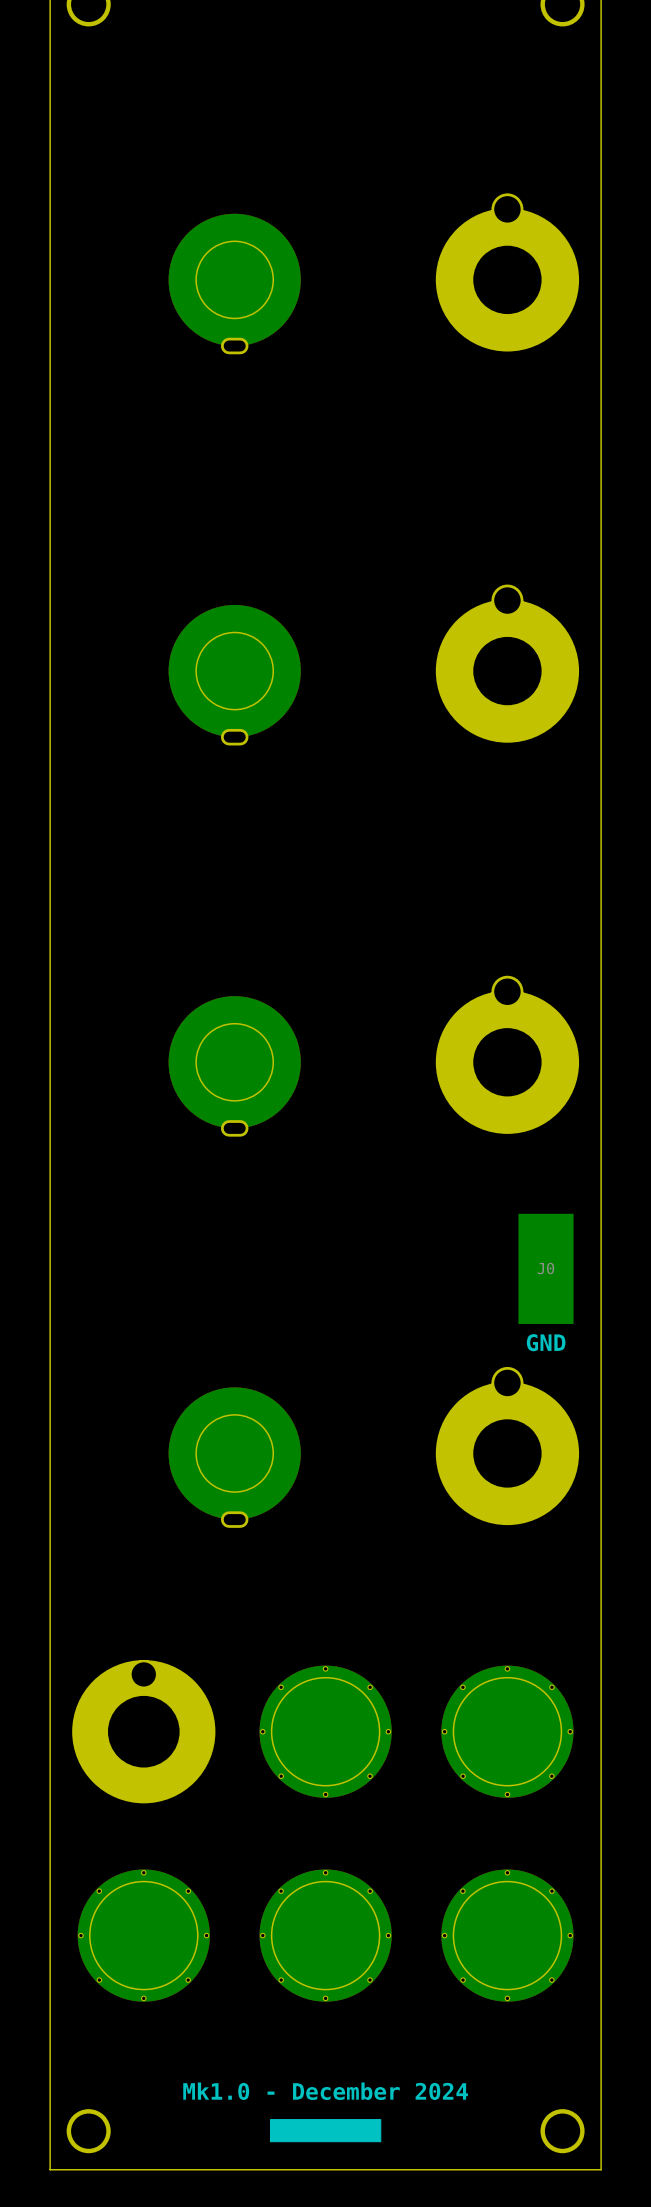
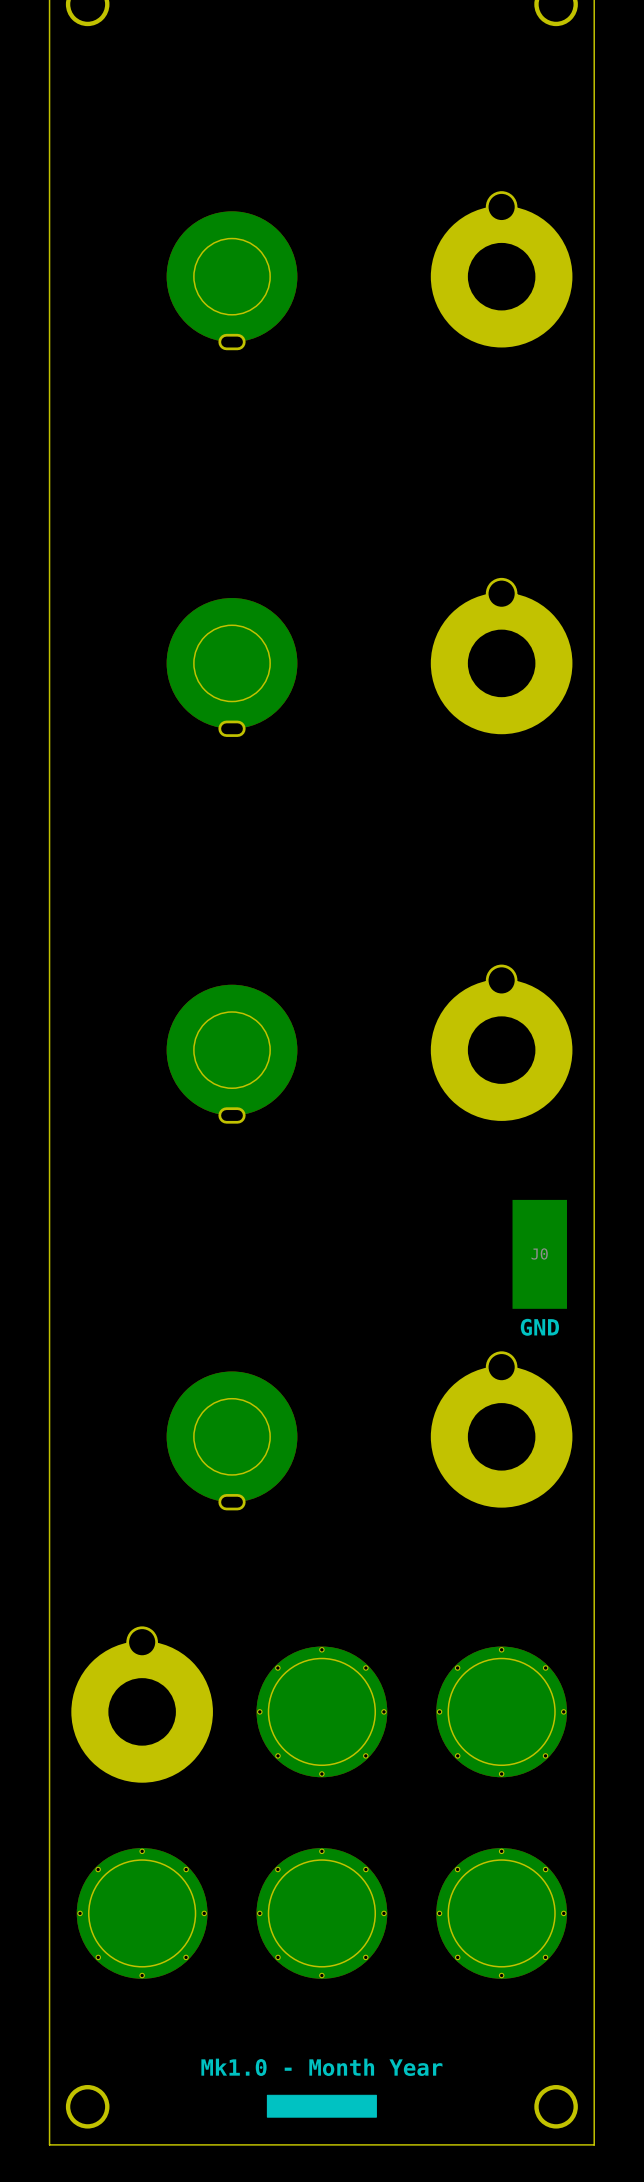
part footprint: [72, 1660, 216, 1804] -> [71, 1626, 213, 1783]
text: Mk1.0 - December 2024 (325, 2091) -> Mk1.0 - Month Year (321, 2067)

